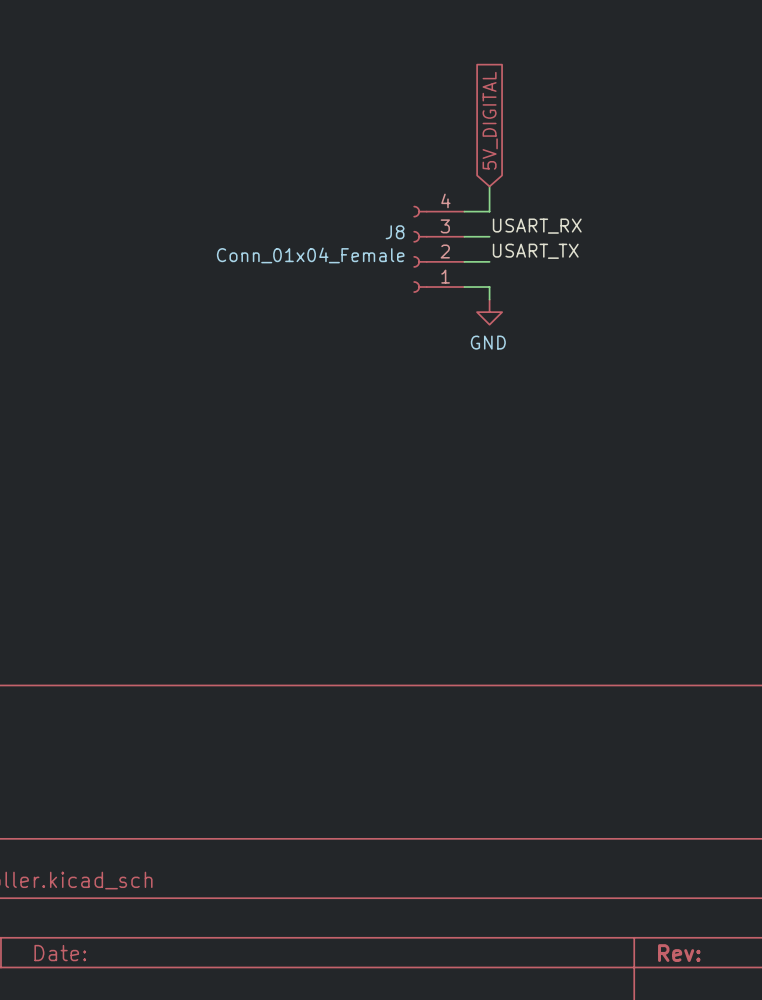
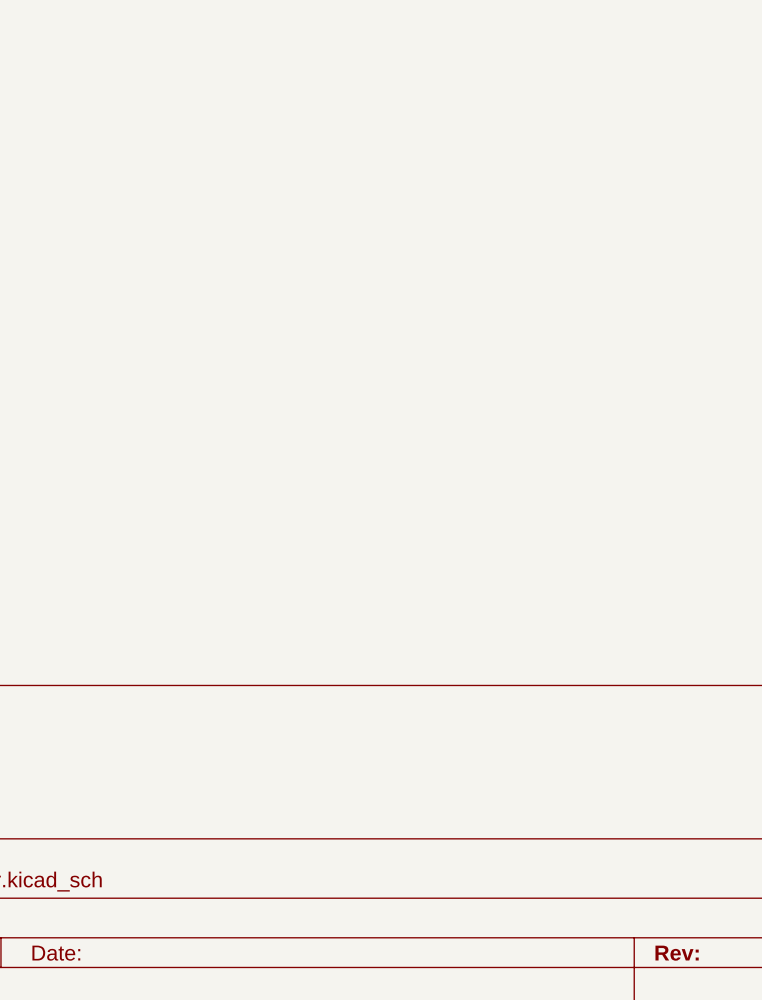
global label: 5V_DIGITAL (490, 120) -> none
wire: (489, 186) (489, 211) (464, 211) -> none
label: USART_RX (537, 226) -> none
wire: (464, 236) (489, 236) -> none
J8: Conn_01x04_Female (438, 249) -> none
label: USART_TX (535, 251) -> none
wire: (464, 261) (489, 261) -> none
wire: (464, 287) (489, 287) (489, 299) -> none
power symbol: GND (489, 312) -> none

